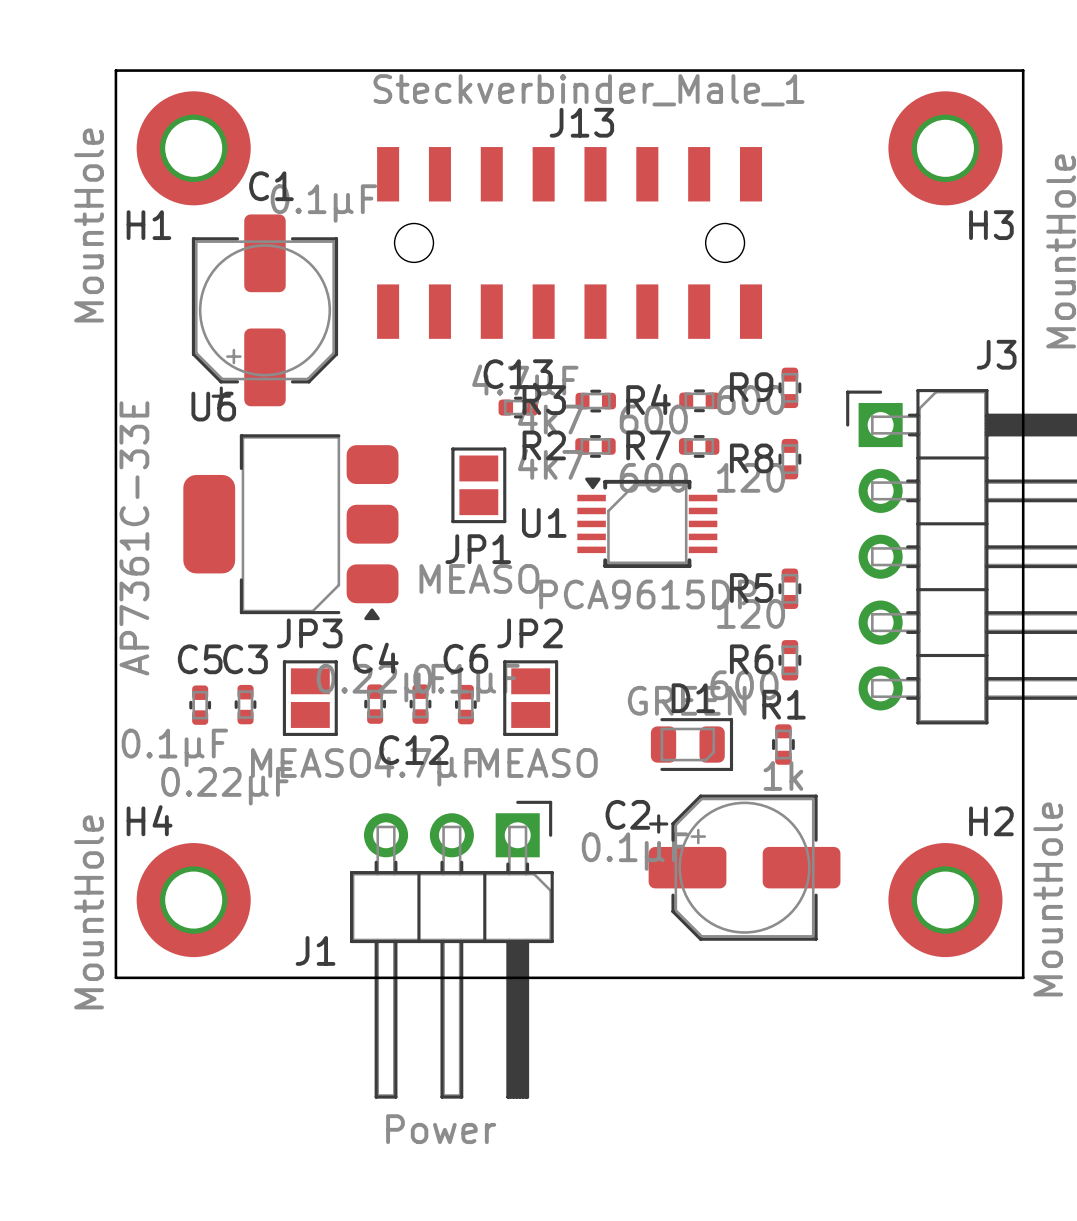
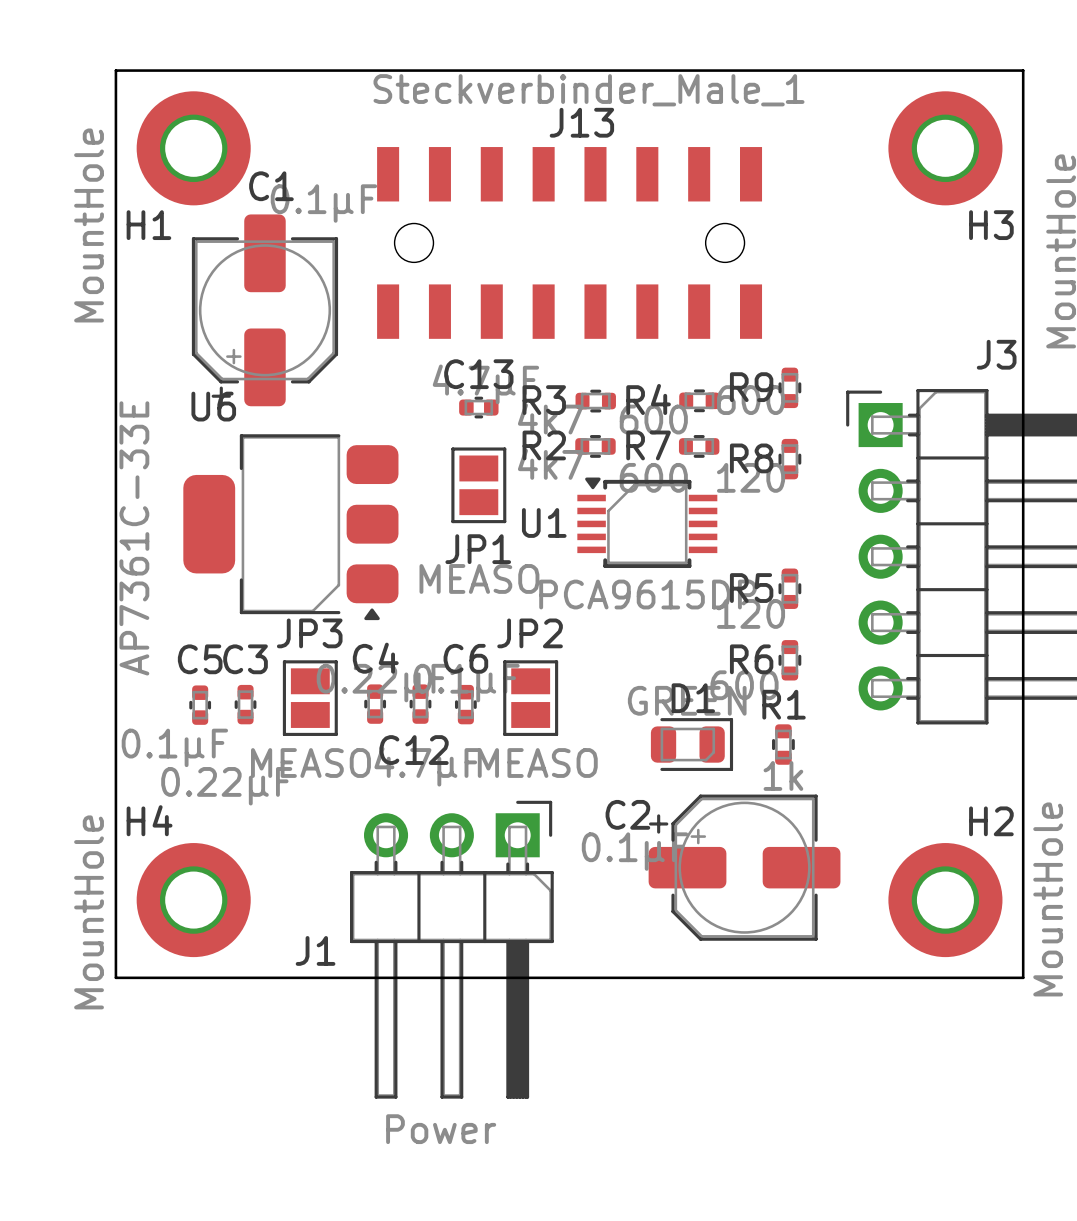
C13 position: (518, 407) -> (478, 407)

